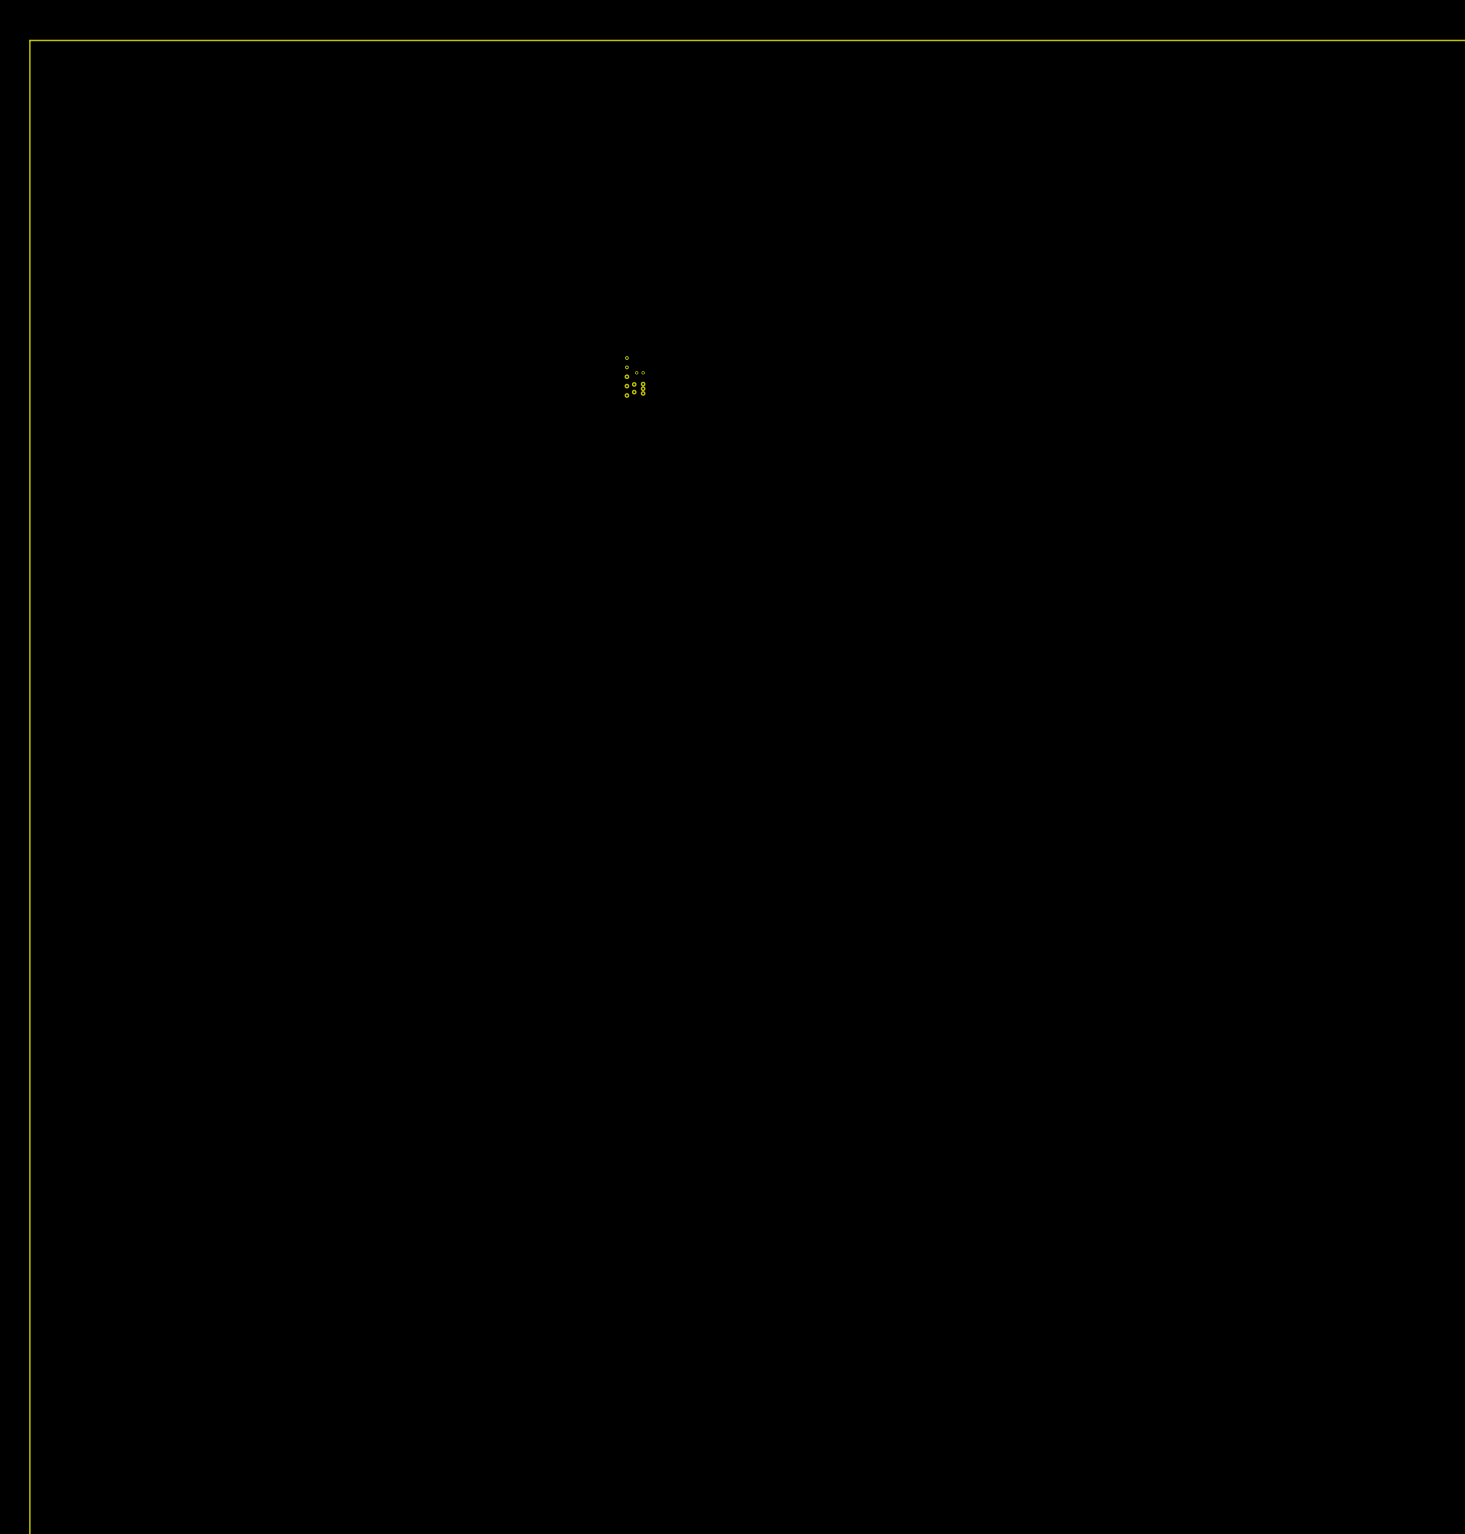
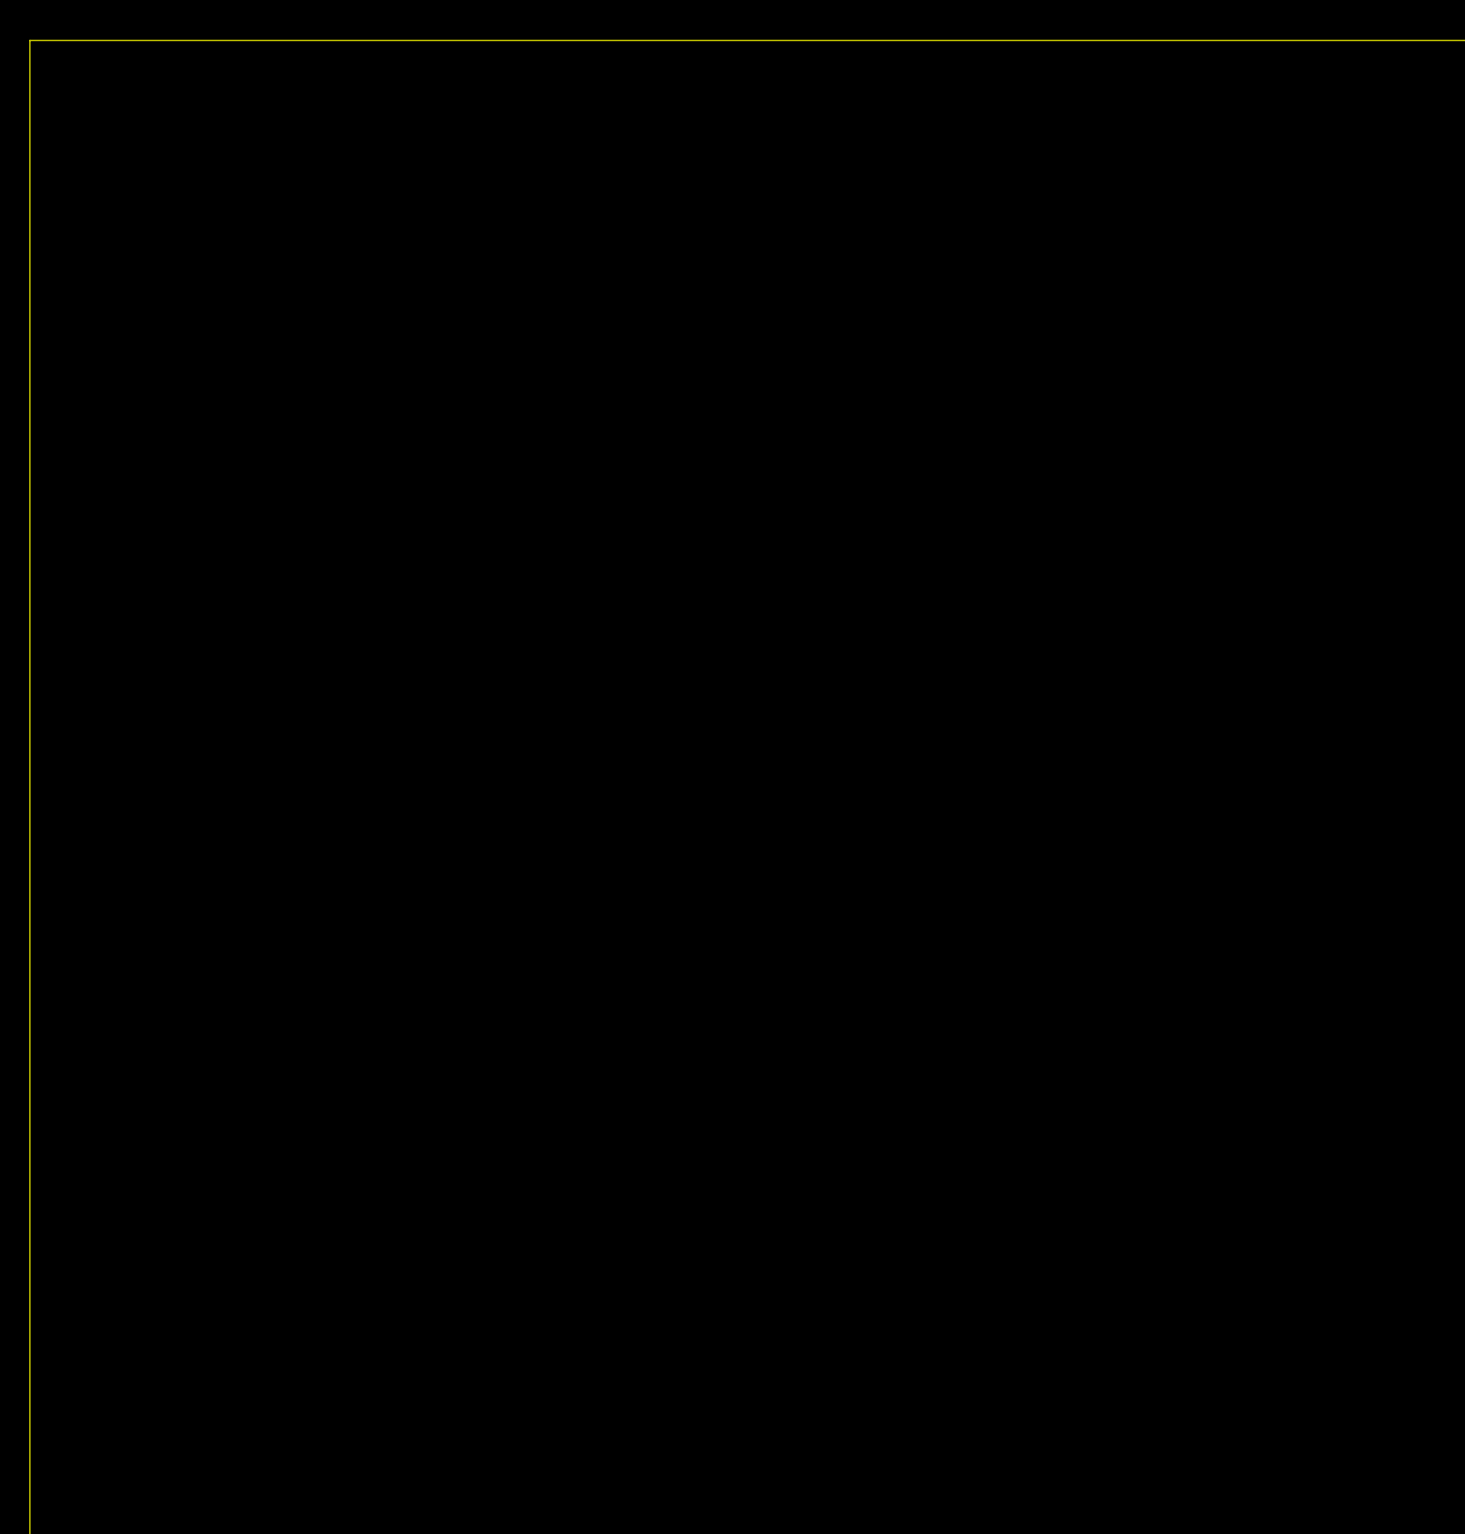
part: (635, 376) -> none

